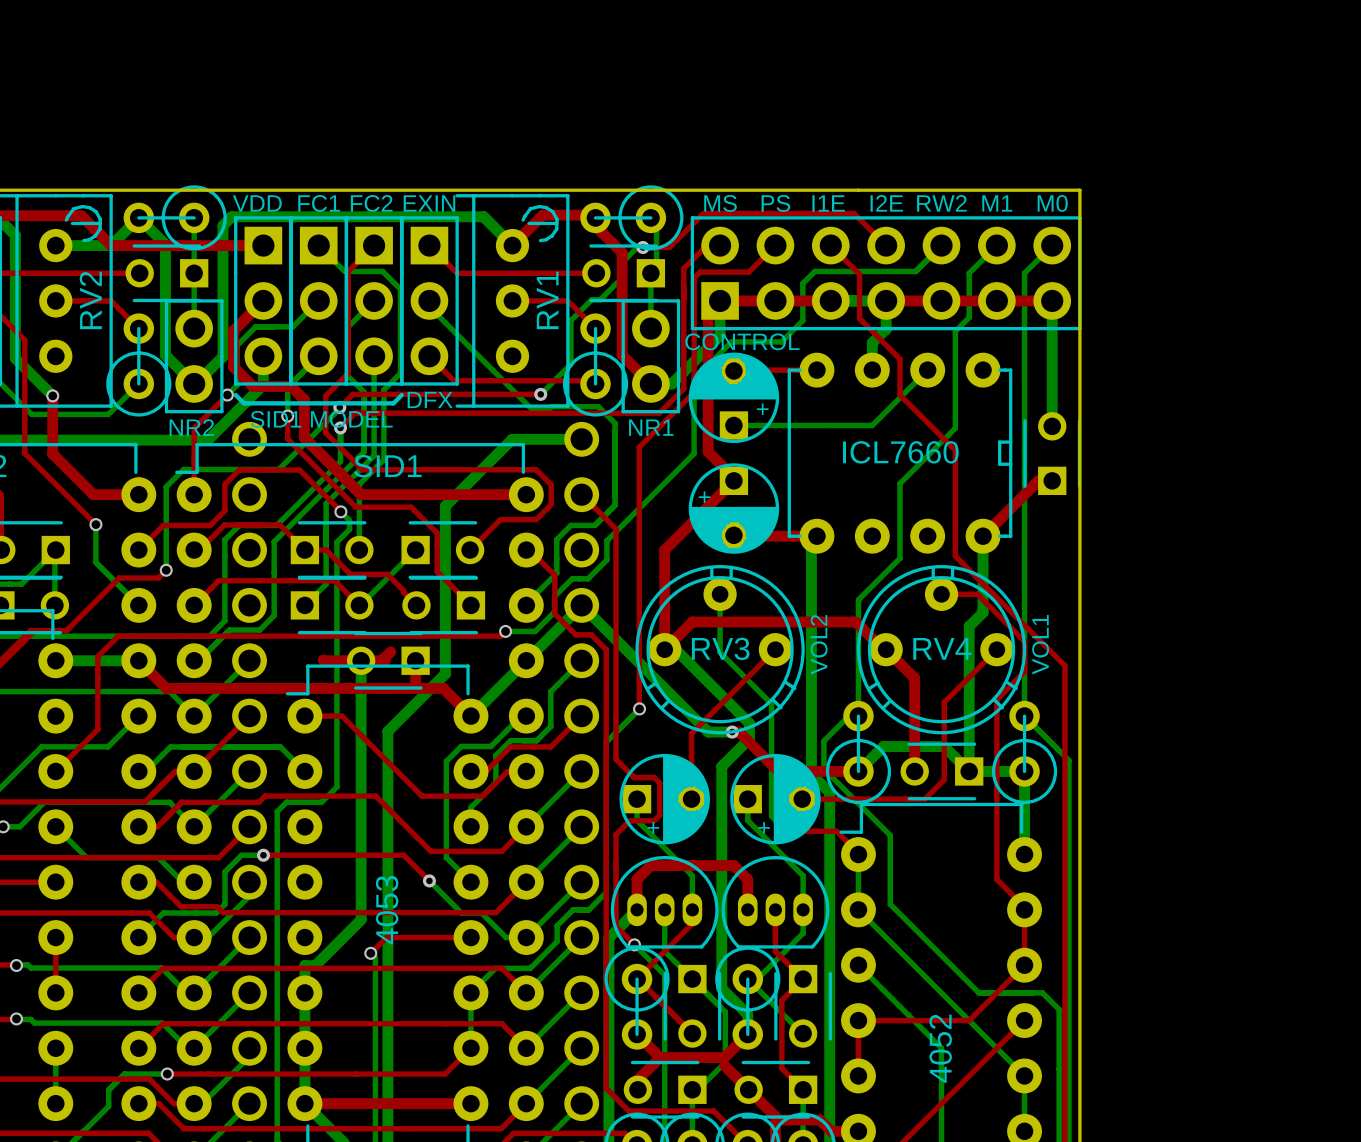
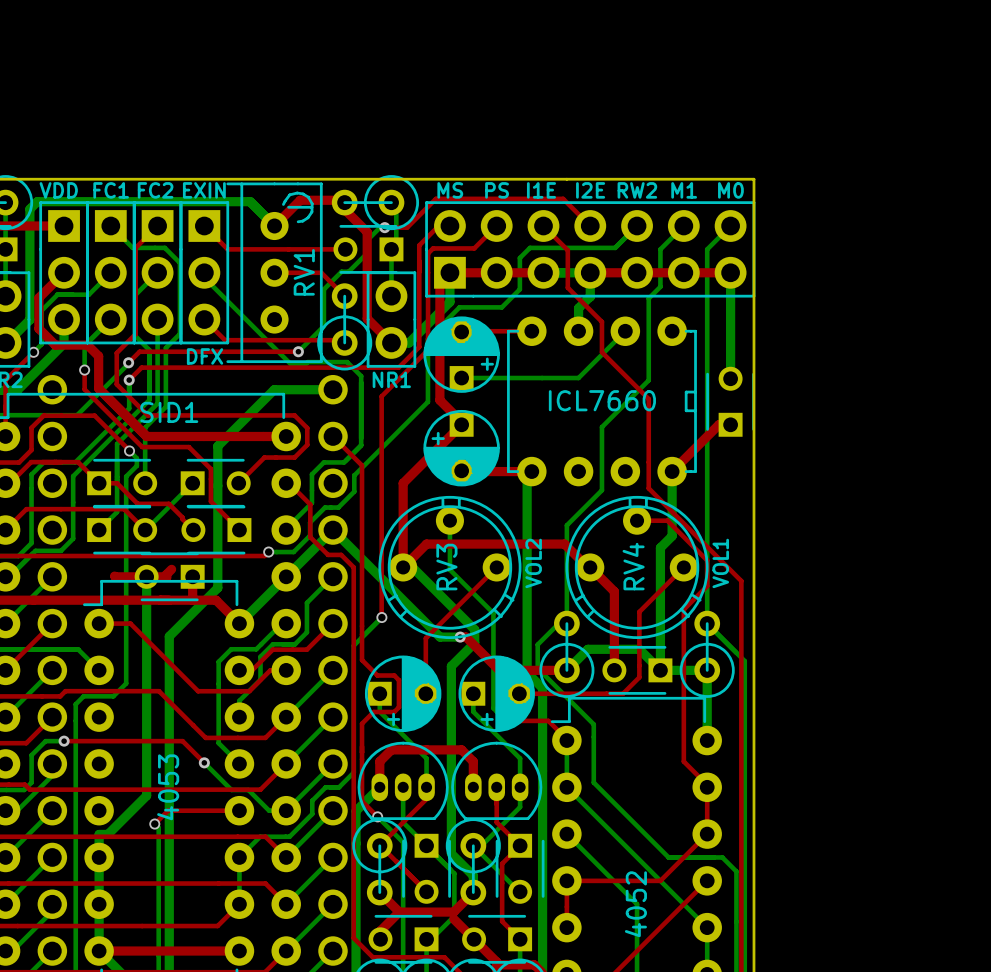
text: CONTROL (742, 341) -> none
line: (235, 395) (244, 403) (393, 403) (401, 395) -> none
text: SID1 MODEL (321, 419) -> none
RV3 name rotation: 0° (720, 648) -> 90° counterclockwise (446, 567)
RV4 name rotation: 0° (942, 648) -> 90° counterclockwise (633, 566)

